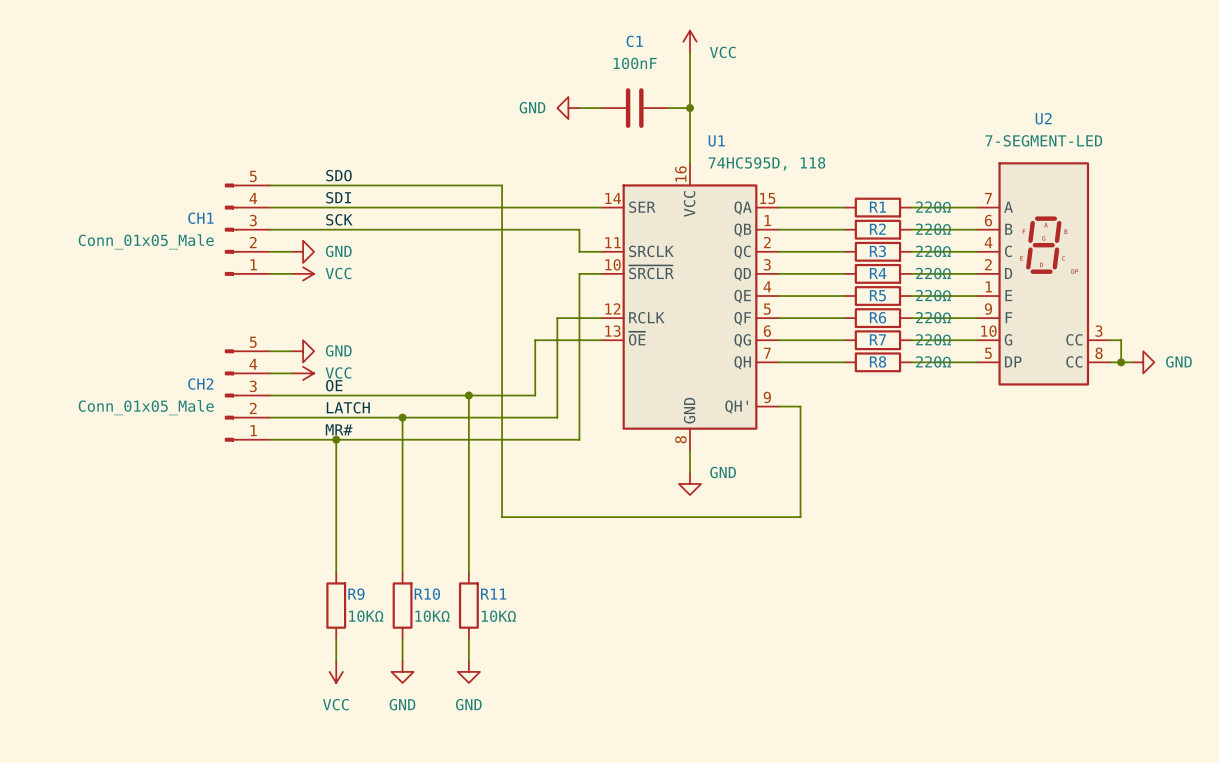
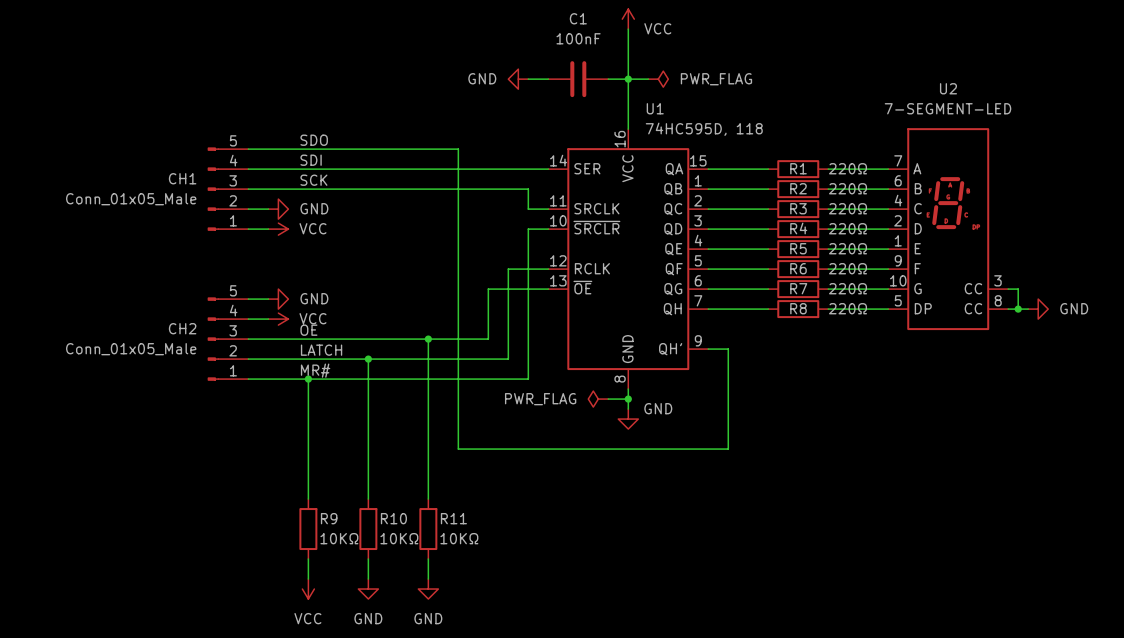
wire: none -> (628, 79) (648, 79)
power symbol: none -> PWR_FLAG (658, 79)
power symbol: none -> PWR_FLAG (598, 399)
wire: none -> (608, 399) (628, 399)
junction: none -> (628, 399)

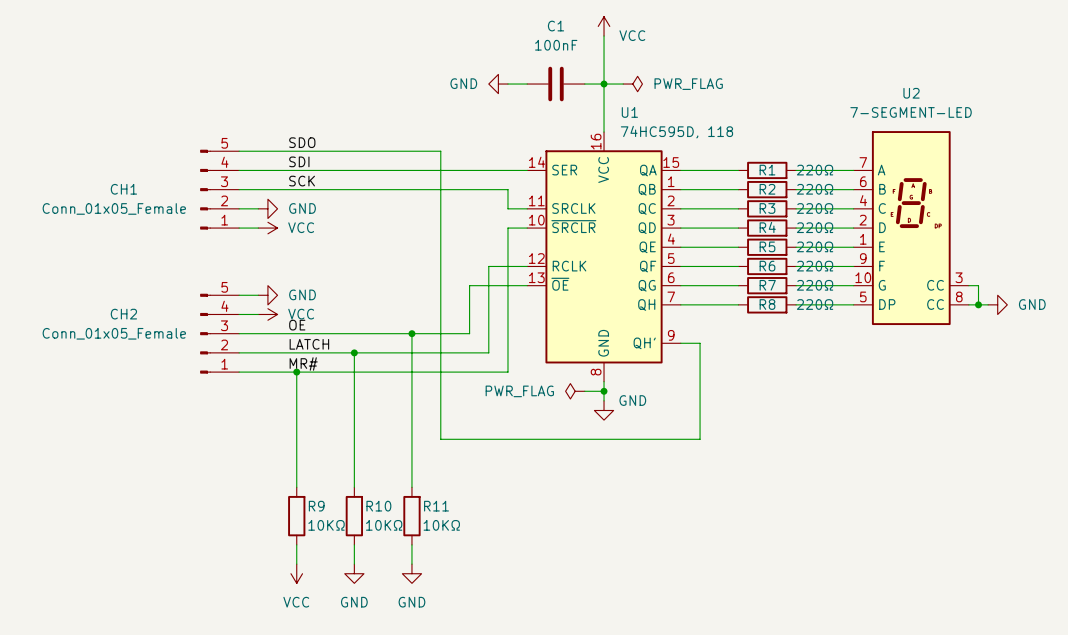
CH1 name position: CH1 (182, 178) -> CH1 (123, 189)
CH1 value: Conn_01x05_Male (131, 199) -> Conn_01x05_Female (114, 208)
CH2 name position: CH2 (182, 328) -> CH2 (123, 314)
CH2 value: Conn_01x05_Male (131, 349) -> Conn_01x05_Female (114, 333)

